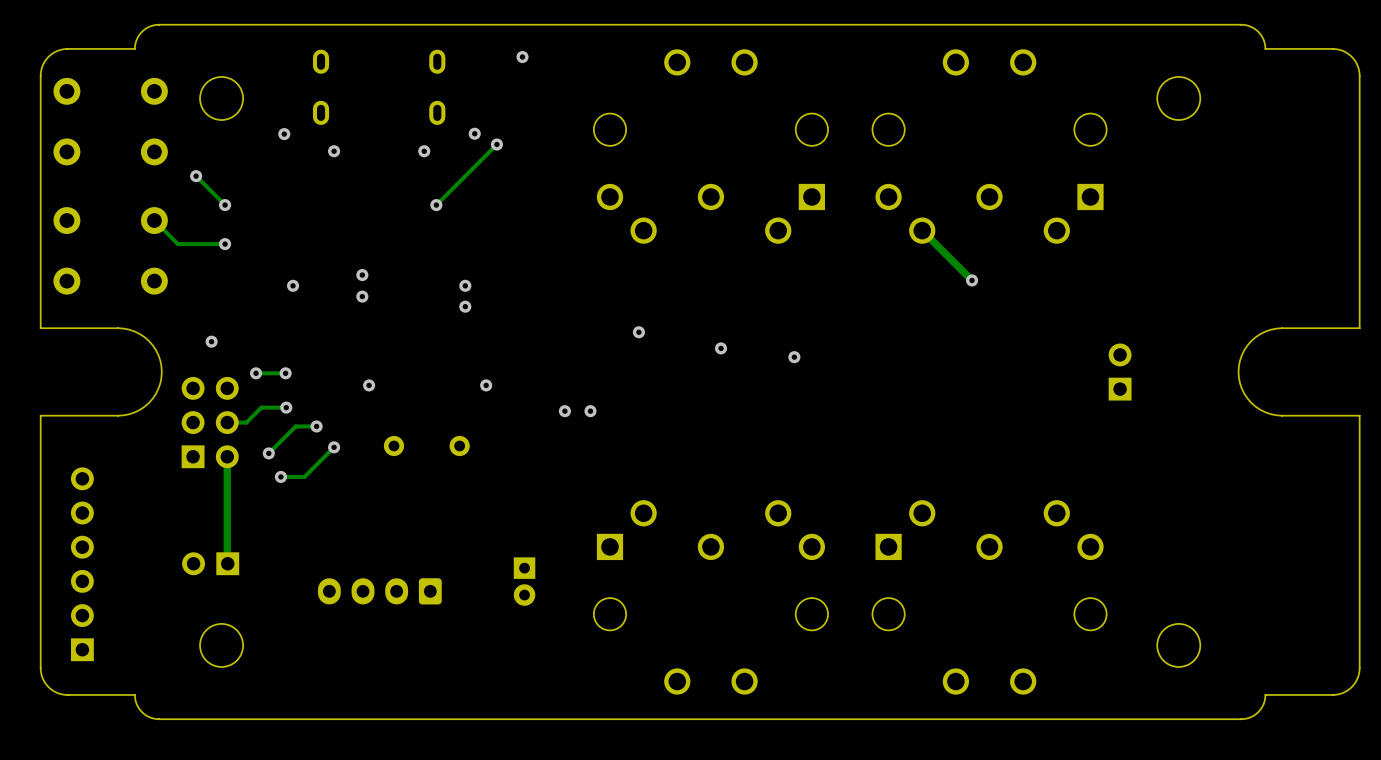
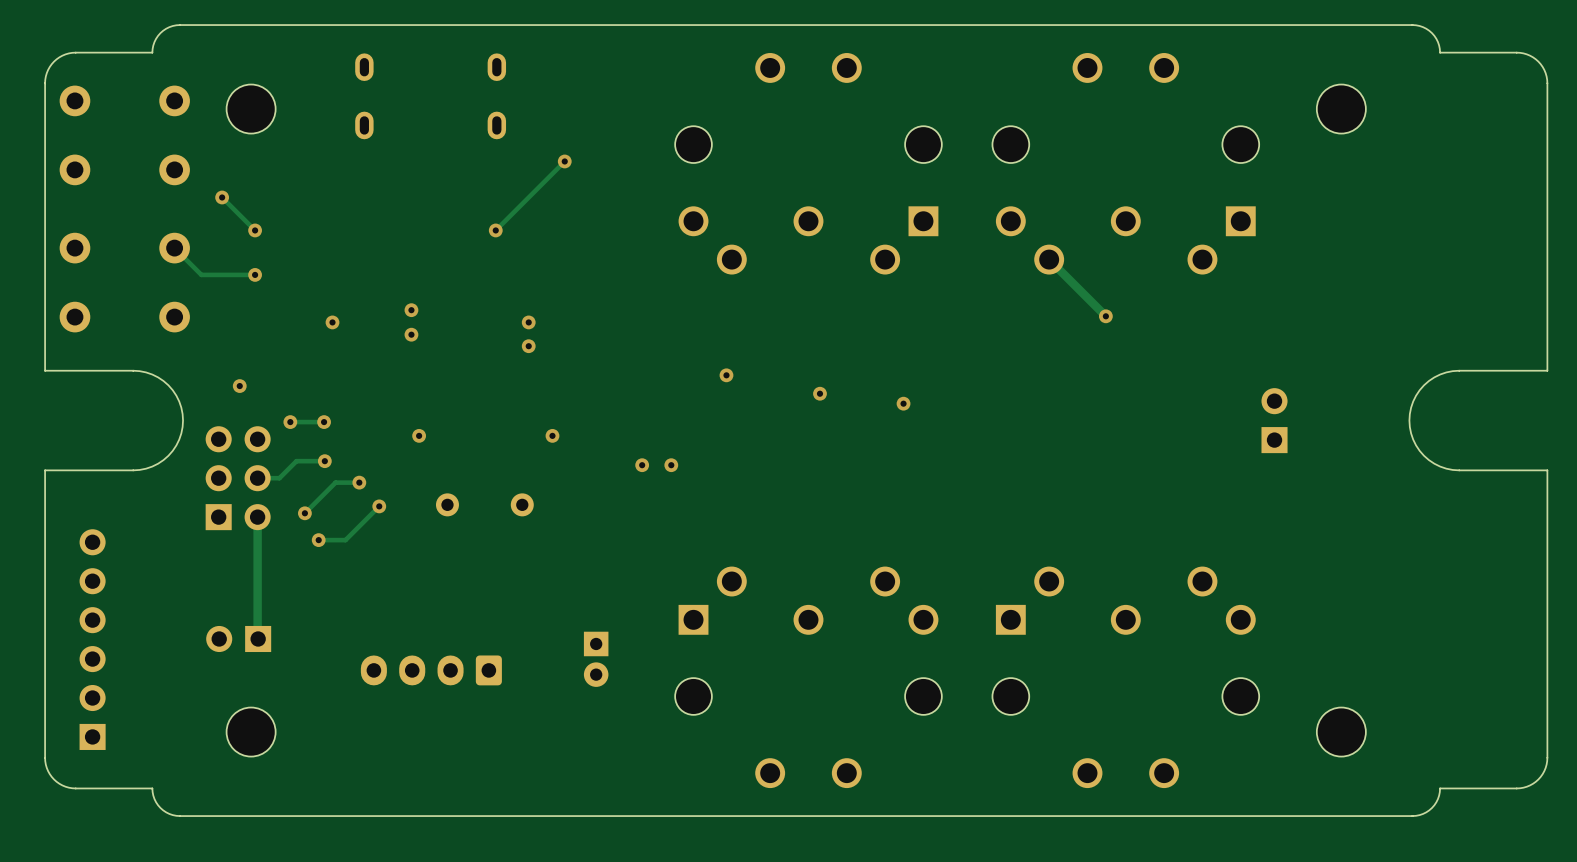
via: (522, 57) -> none
via: (474, 133) -> none
via: (284, 134) -> none
via: (334, 151) -> none
via: (424, 151) -> none

